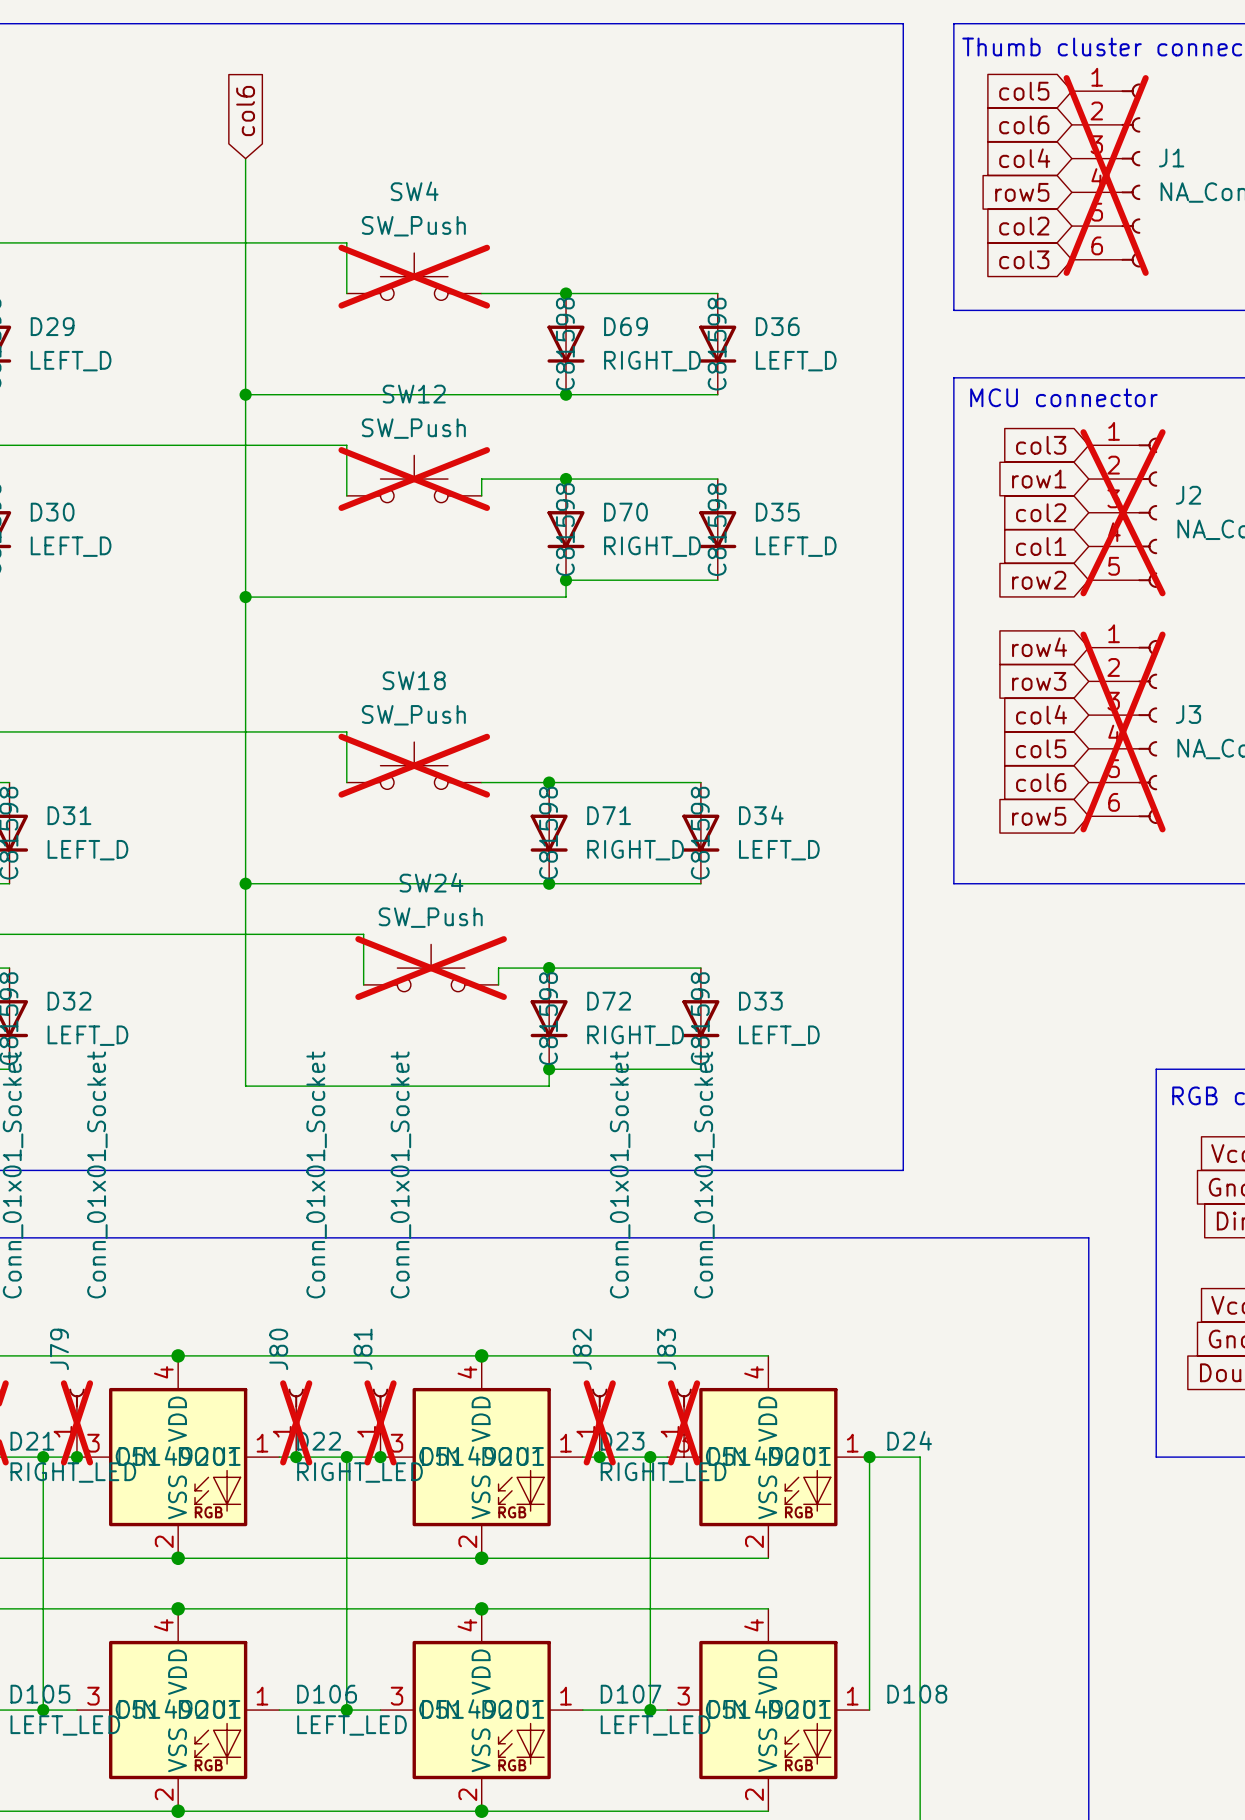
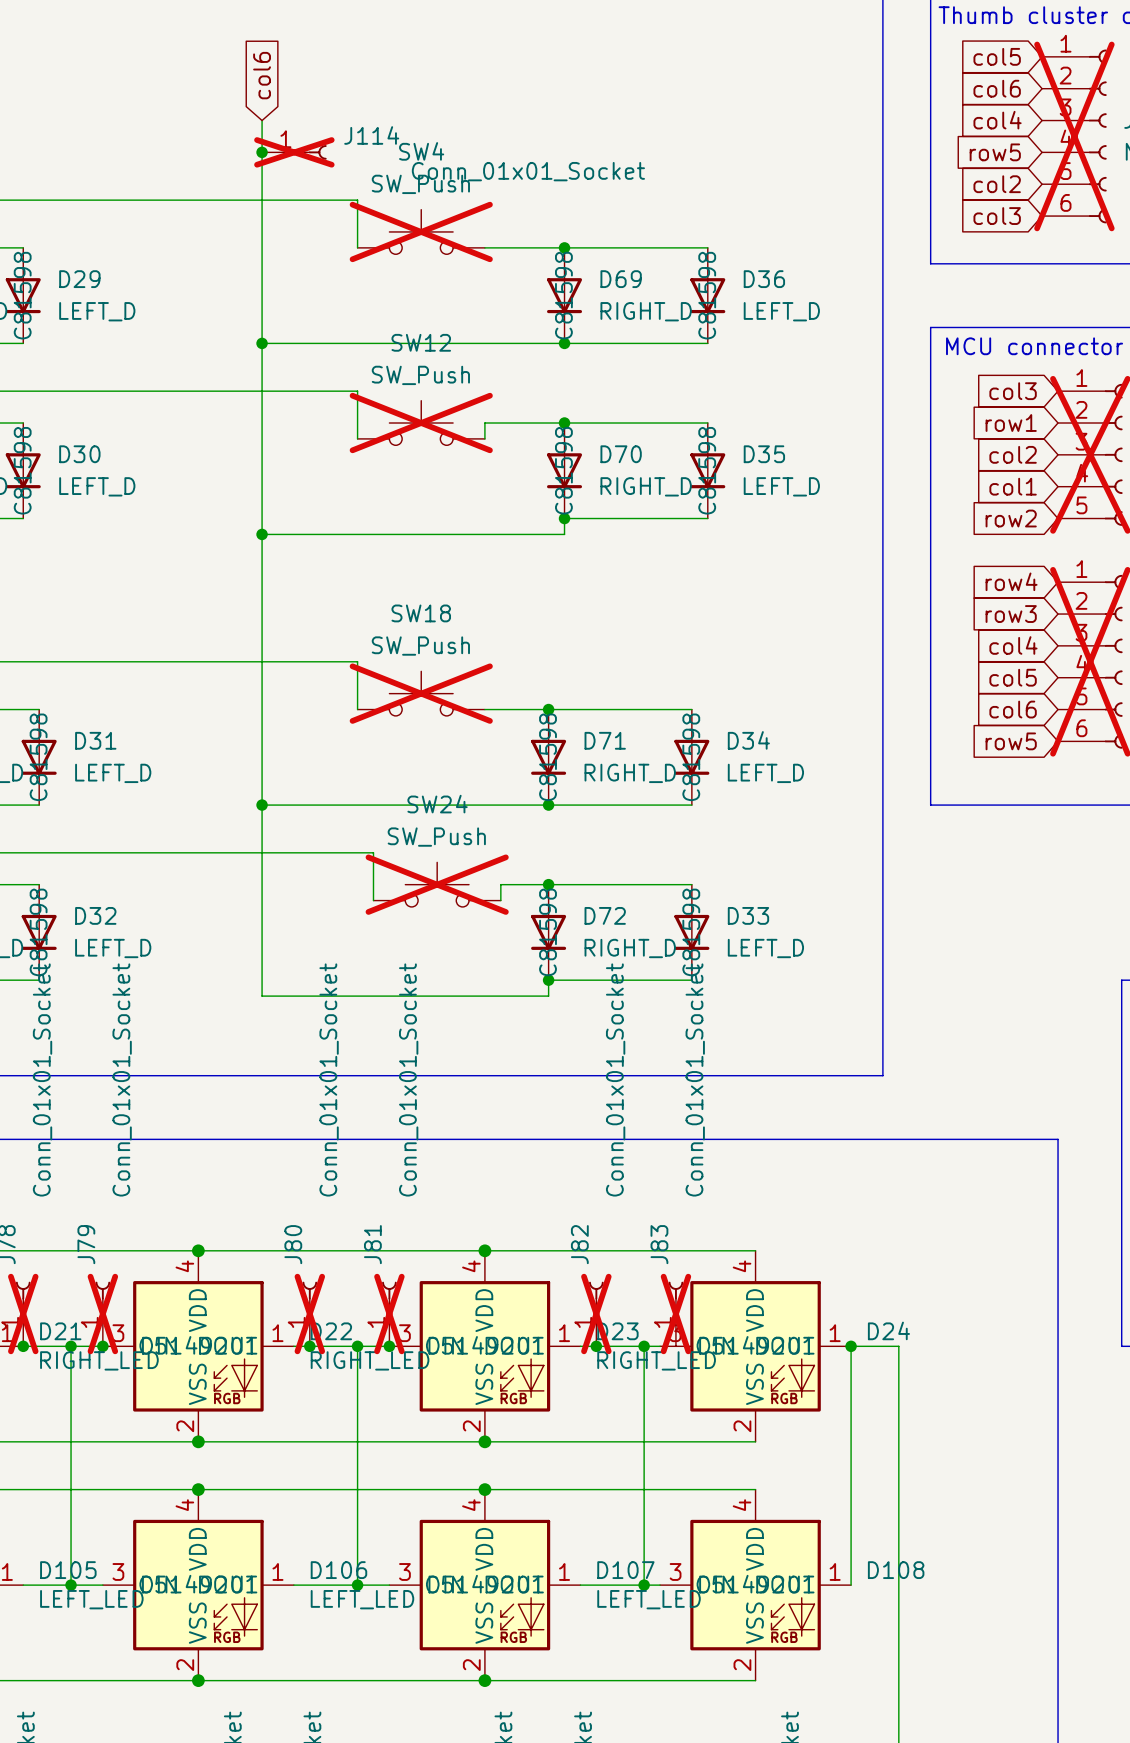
junction: none -> (262, 152)
J114: none -> Conn_01x01_Socket (294, 152)

